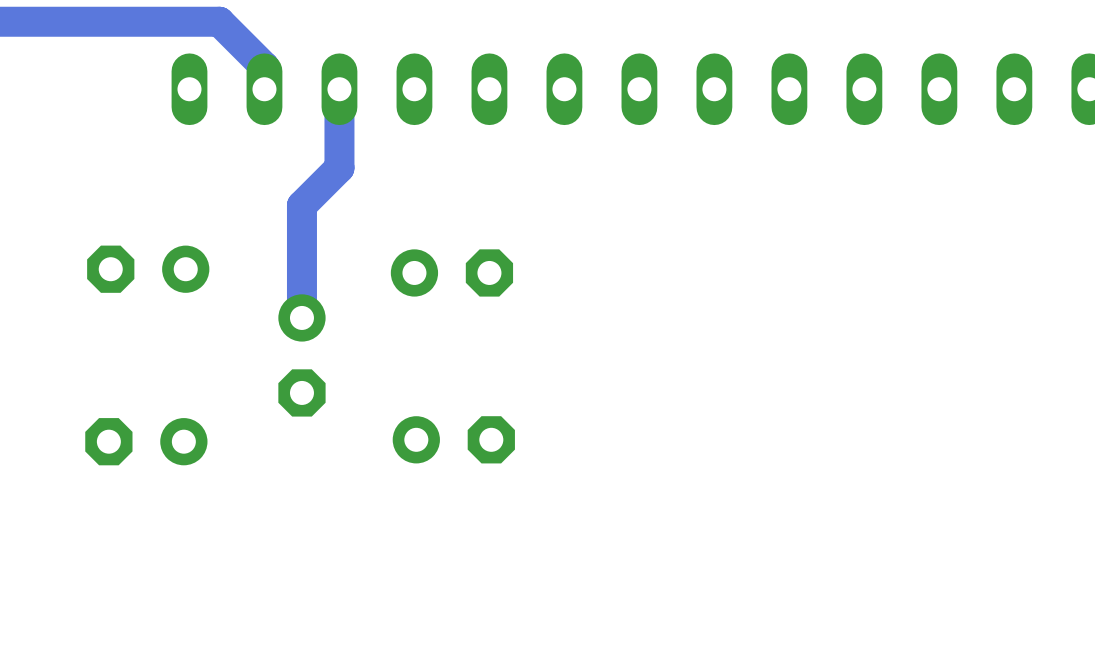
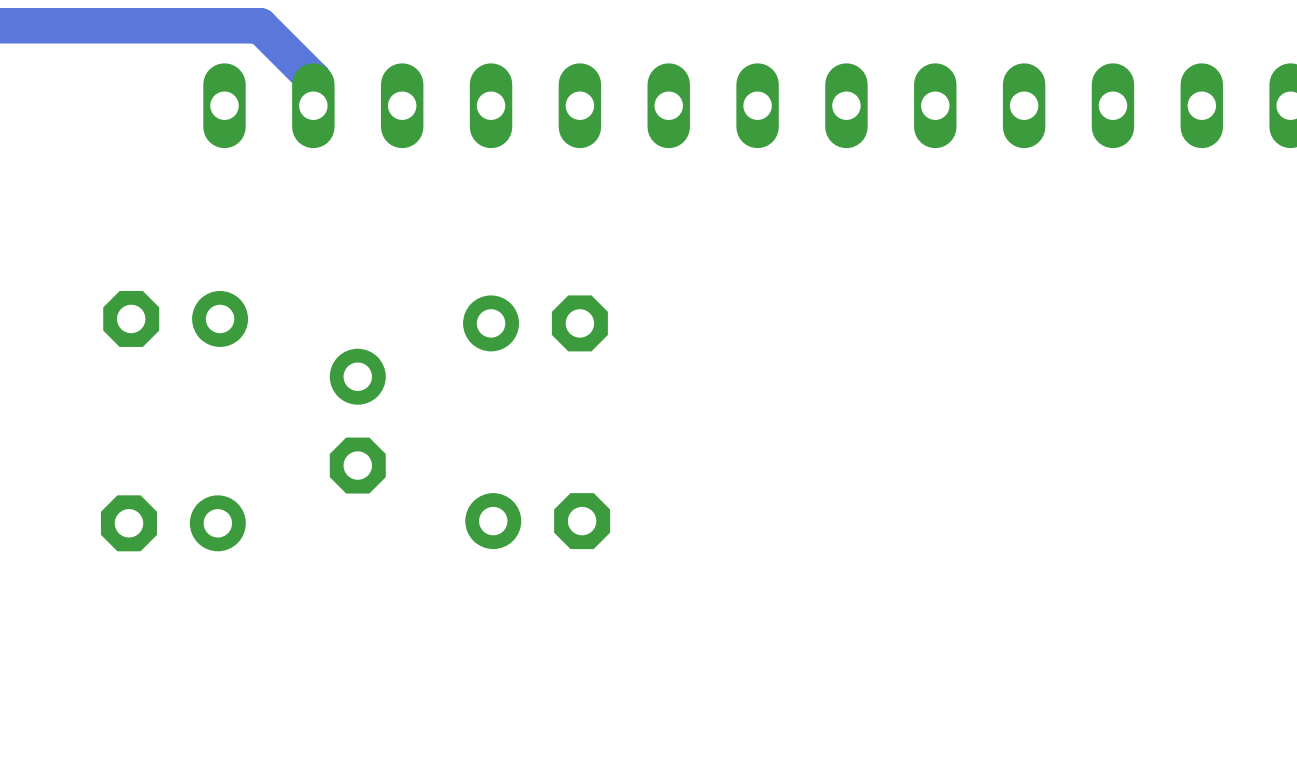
track: (339, 89) (339, 167) (301, 205) (301, 317) -> none

